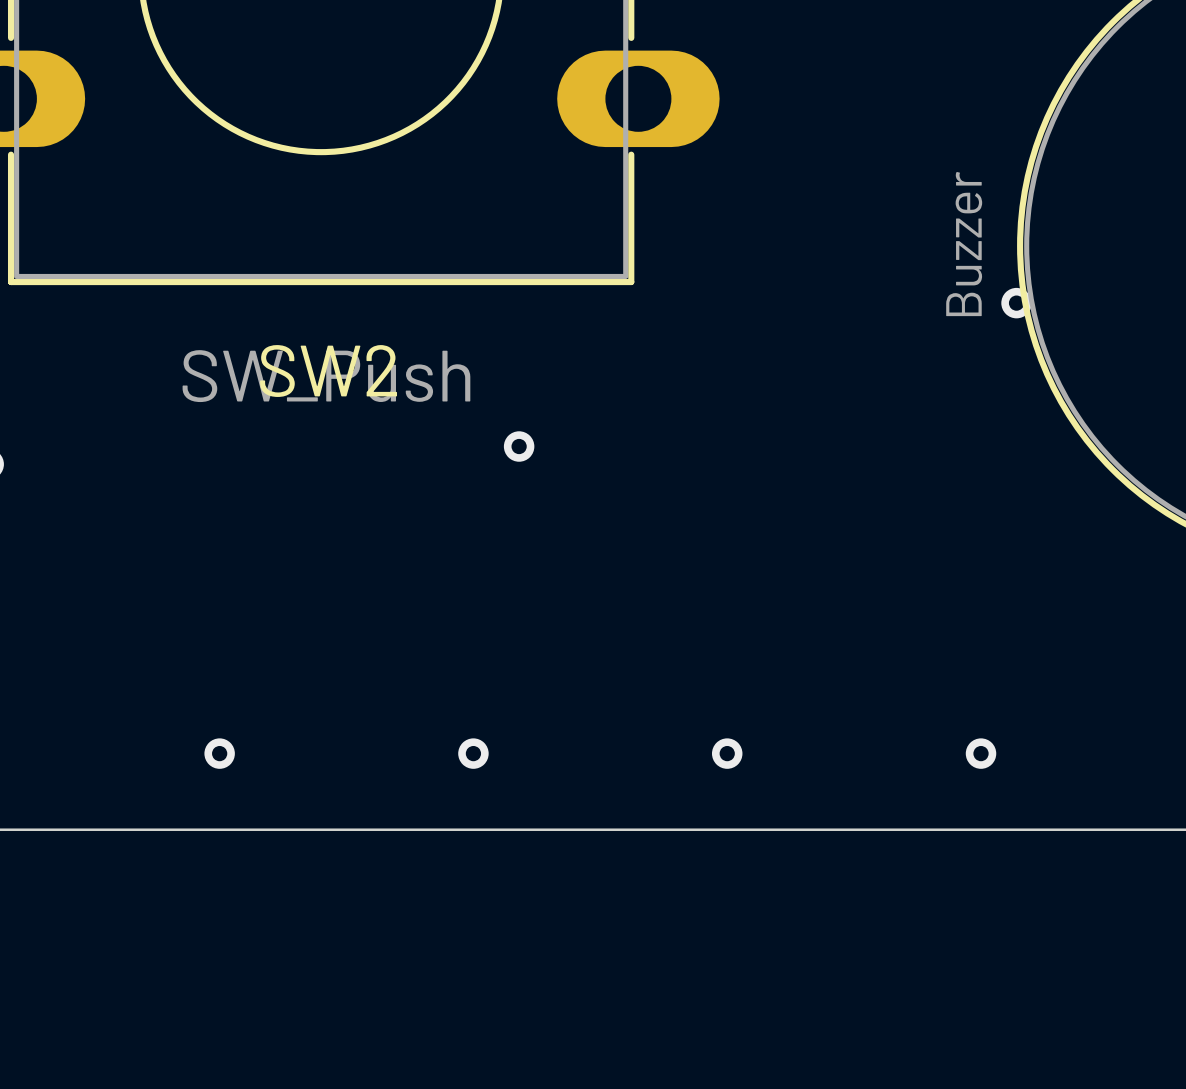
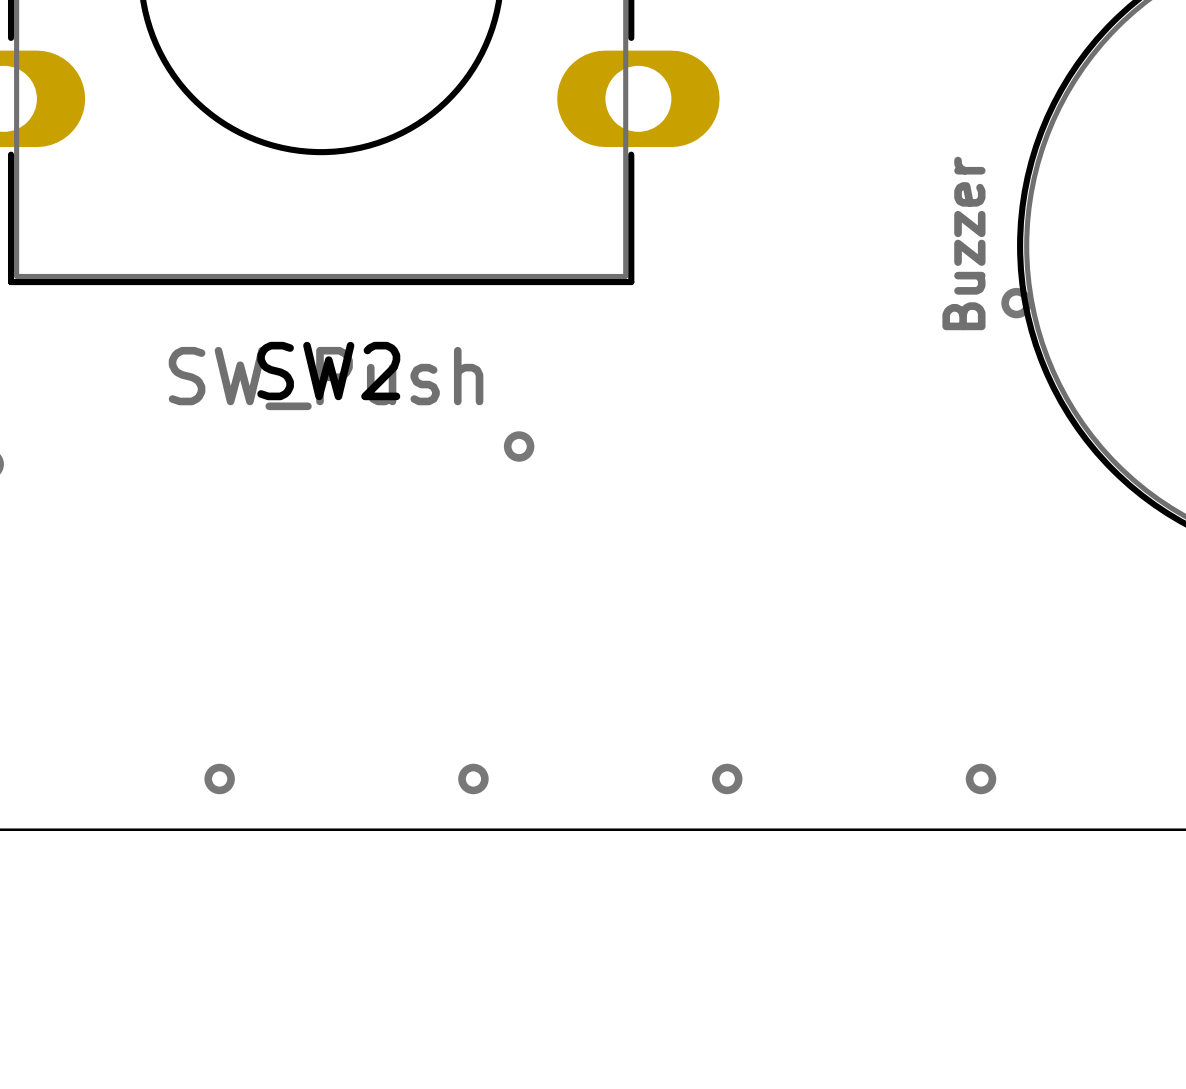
via position: (219, 753) -> (219, 778)
via position: (473, 753) -> (473, 778)
via position: (727, 753) -> (727, 778)
via position: (981, 753) -> (981, 778)

